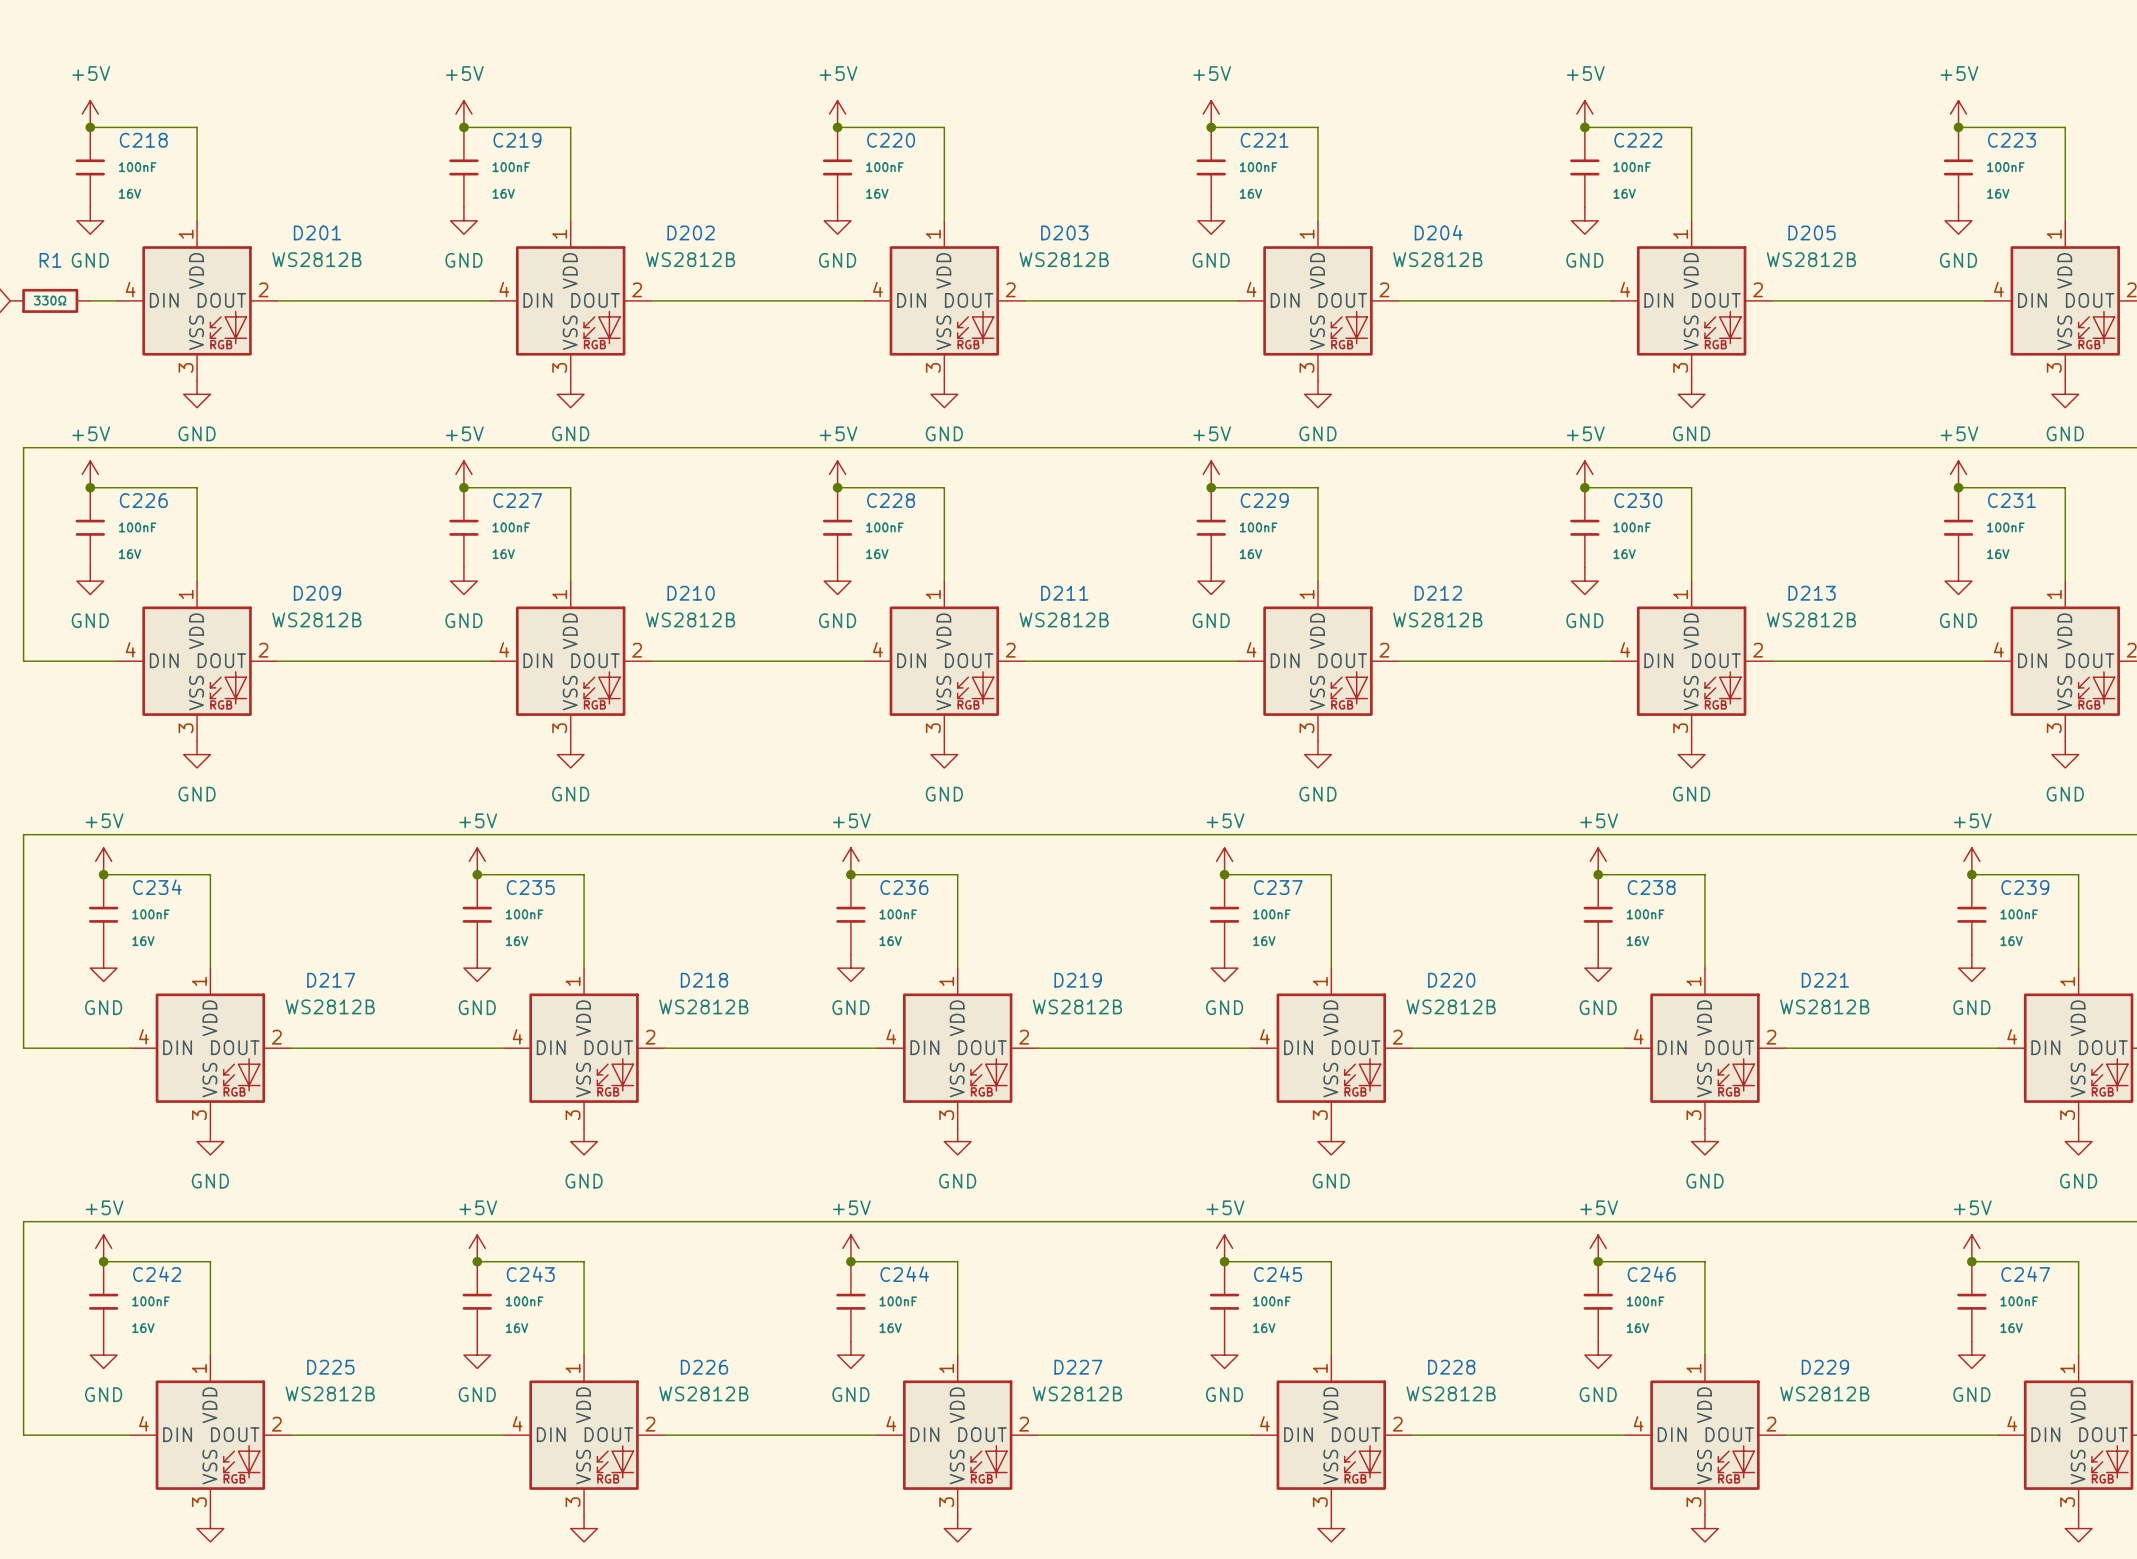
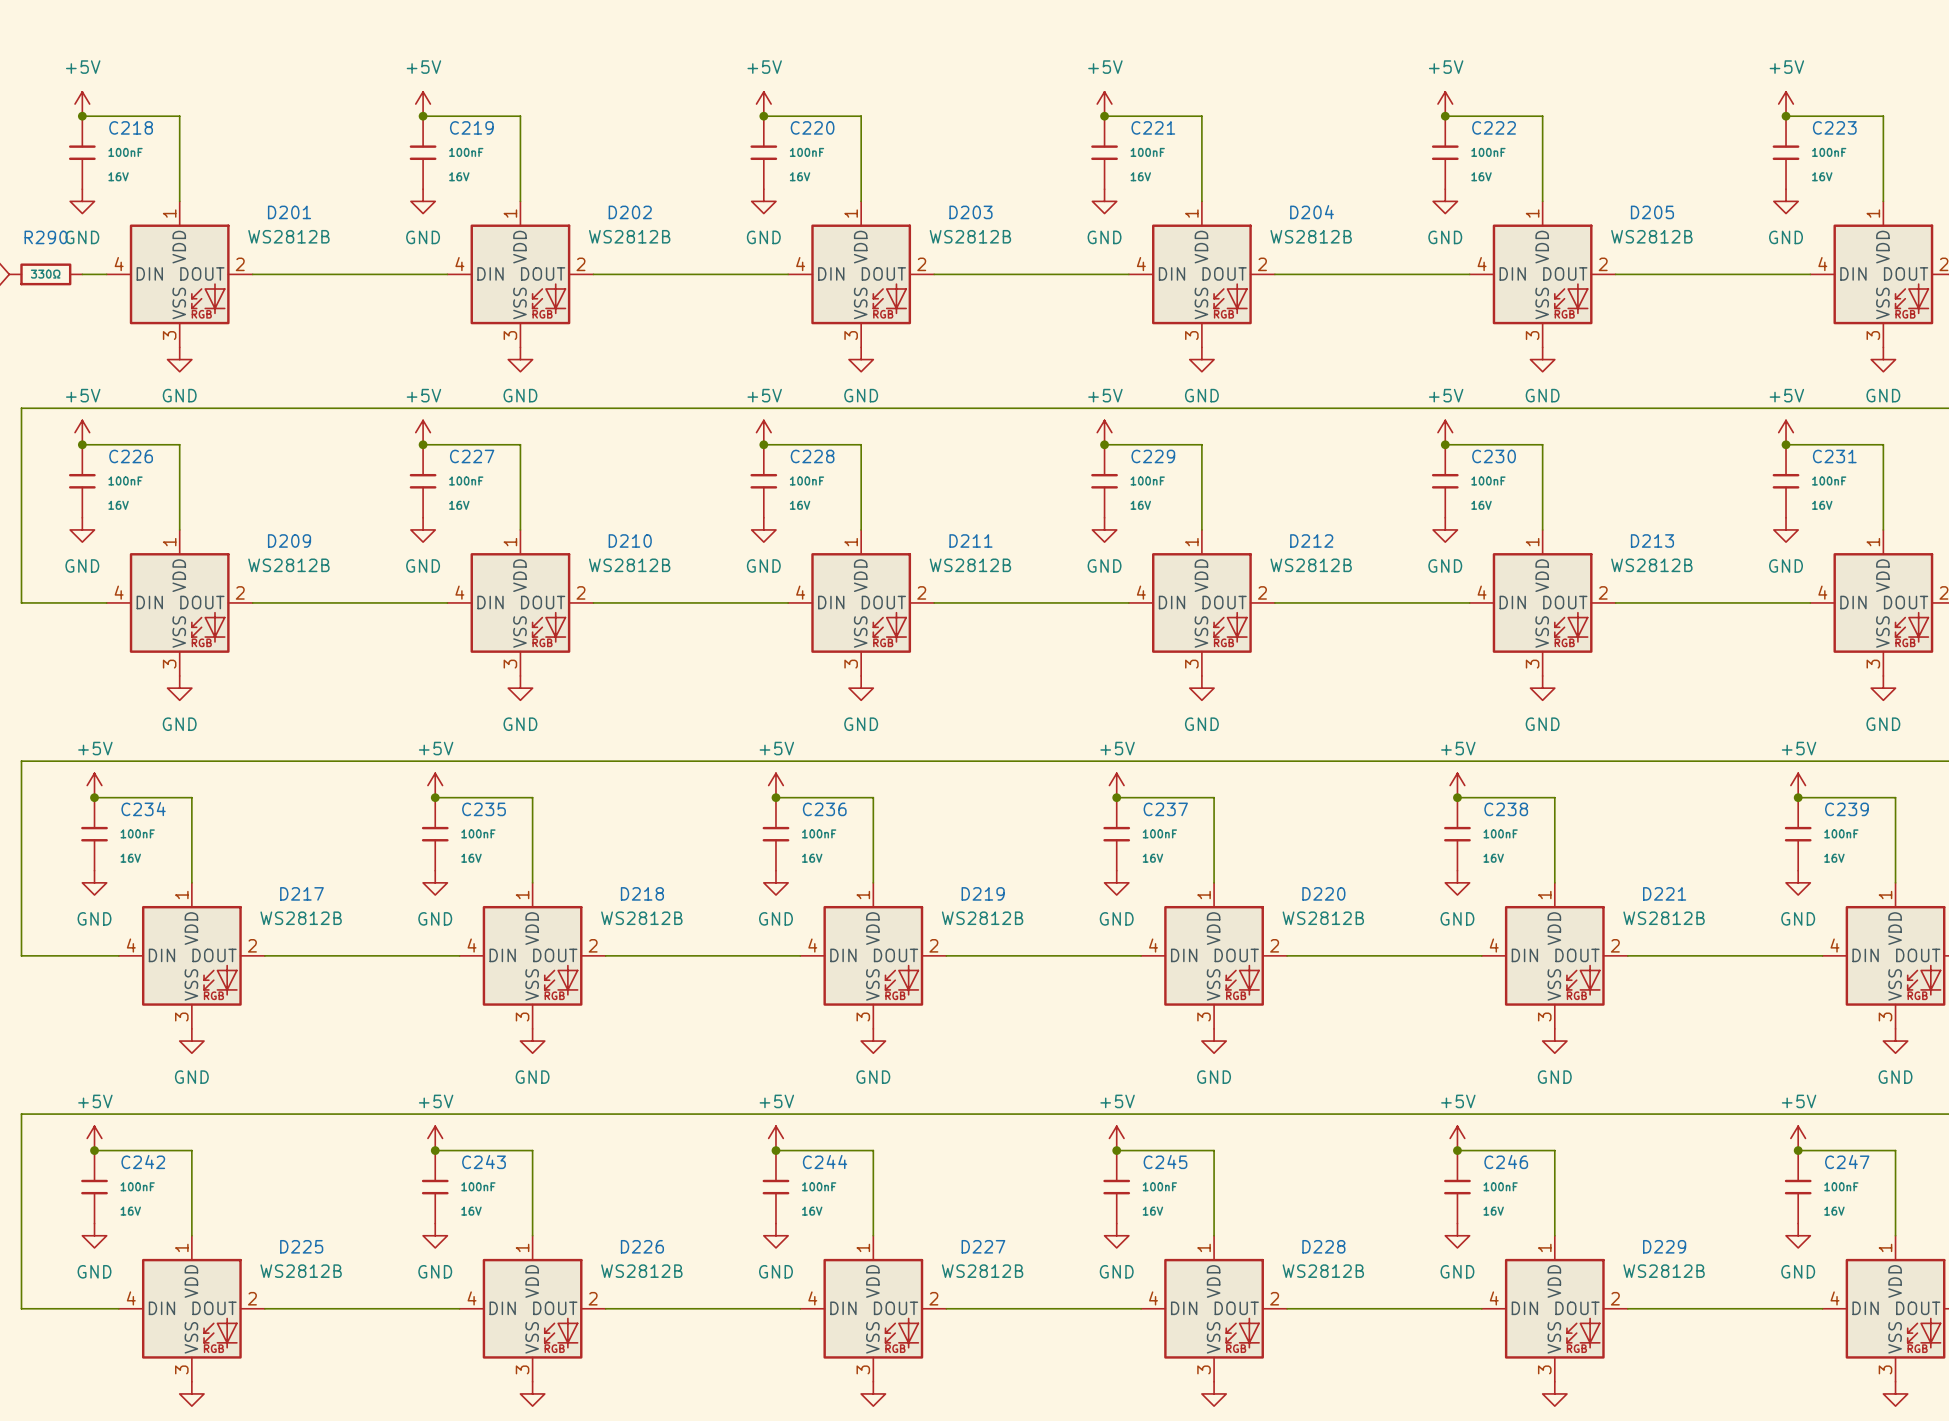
R1 name: R1 (50, 260) -> R290 (46, 237)

